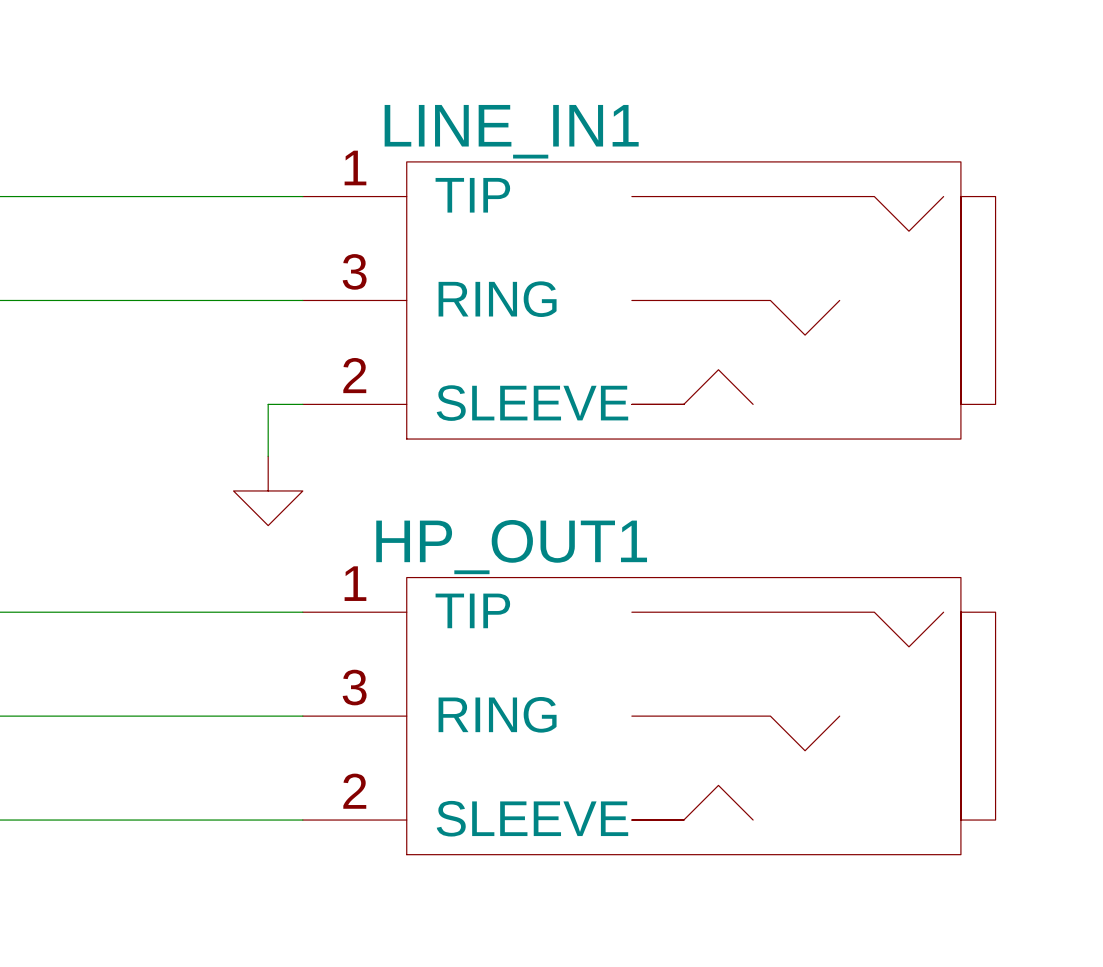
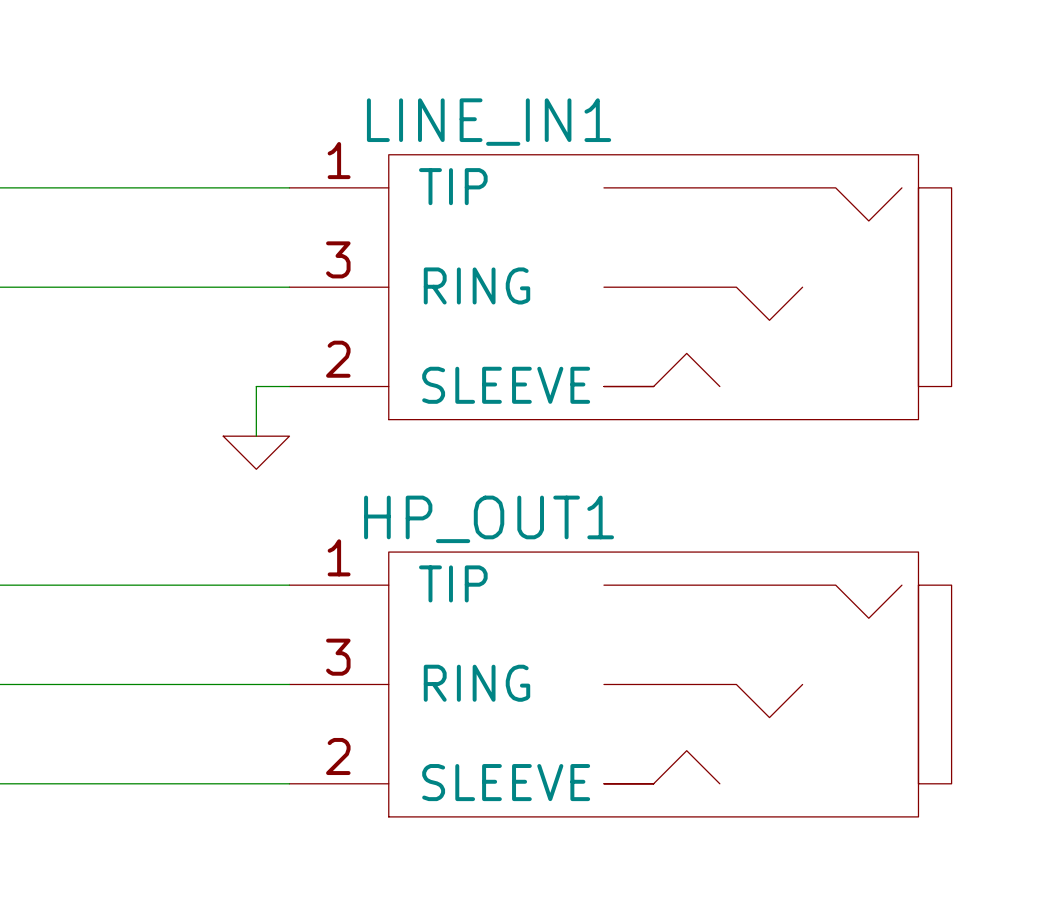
power symbol shape: [233, 456, 303, 526] -> [223, 436, 290, 470]

